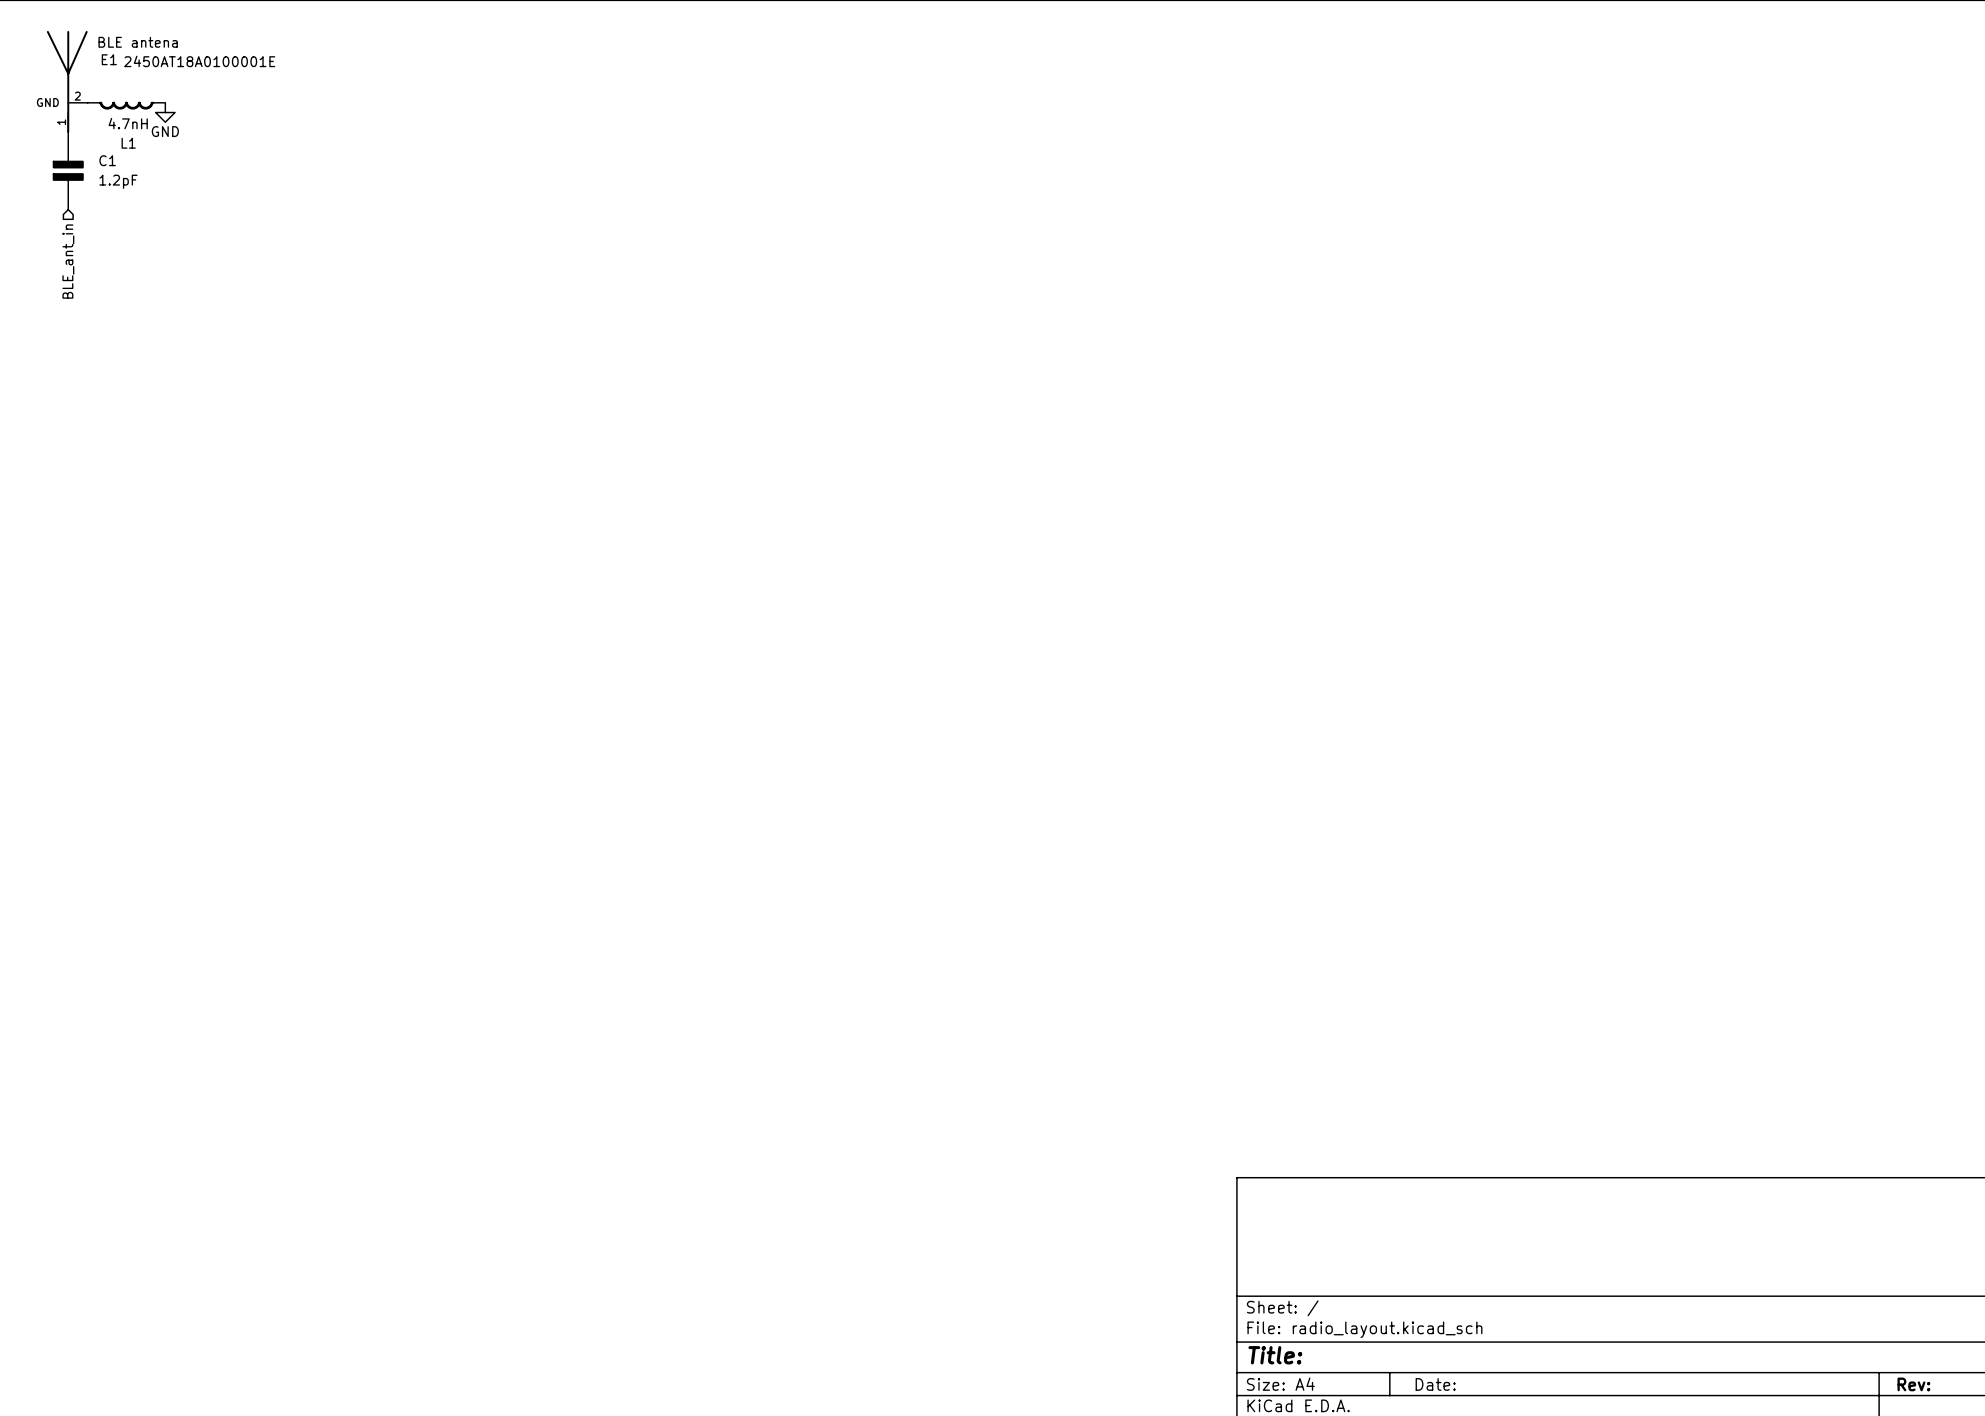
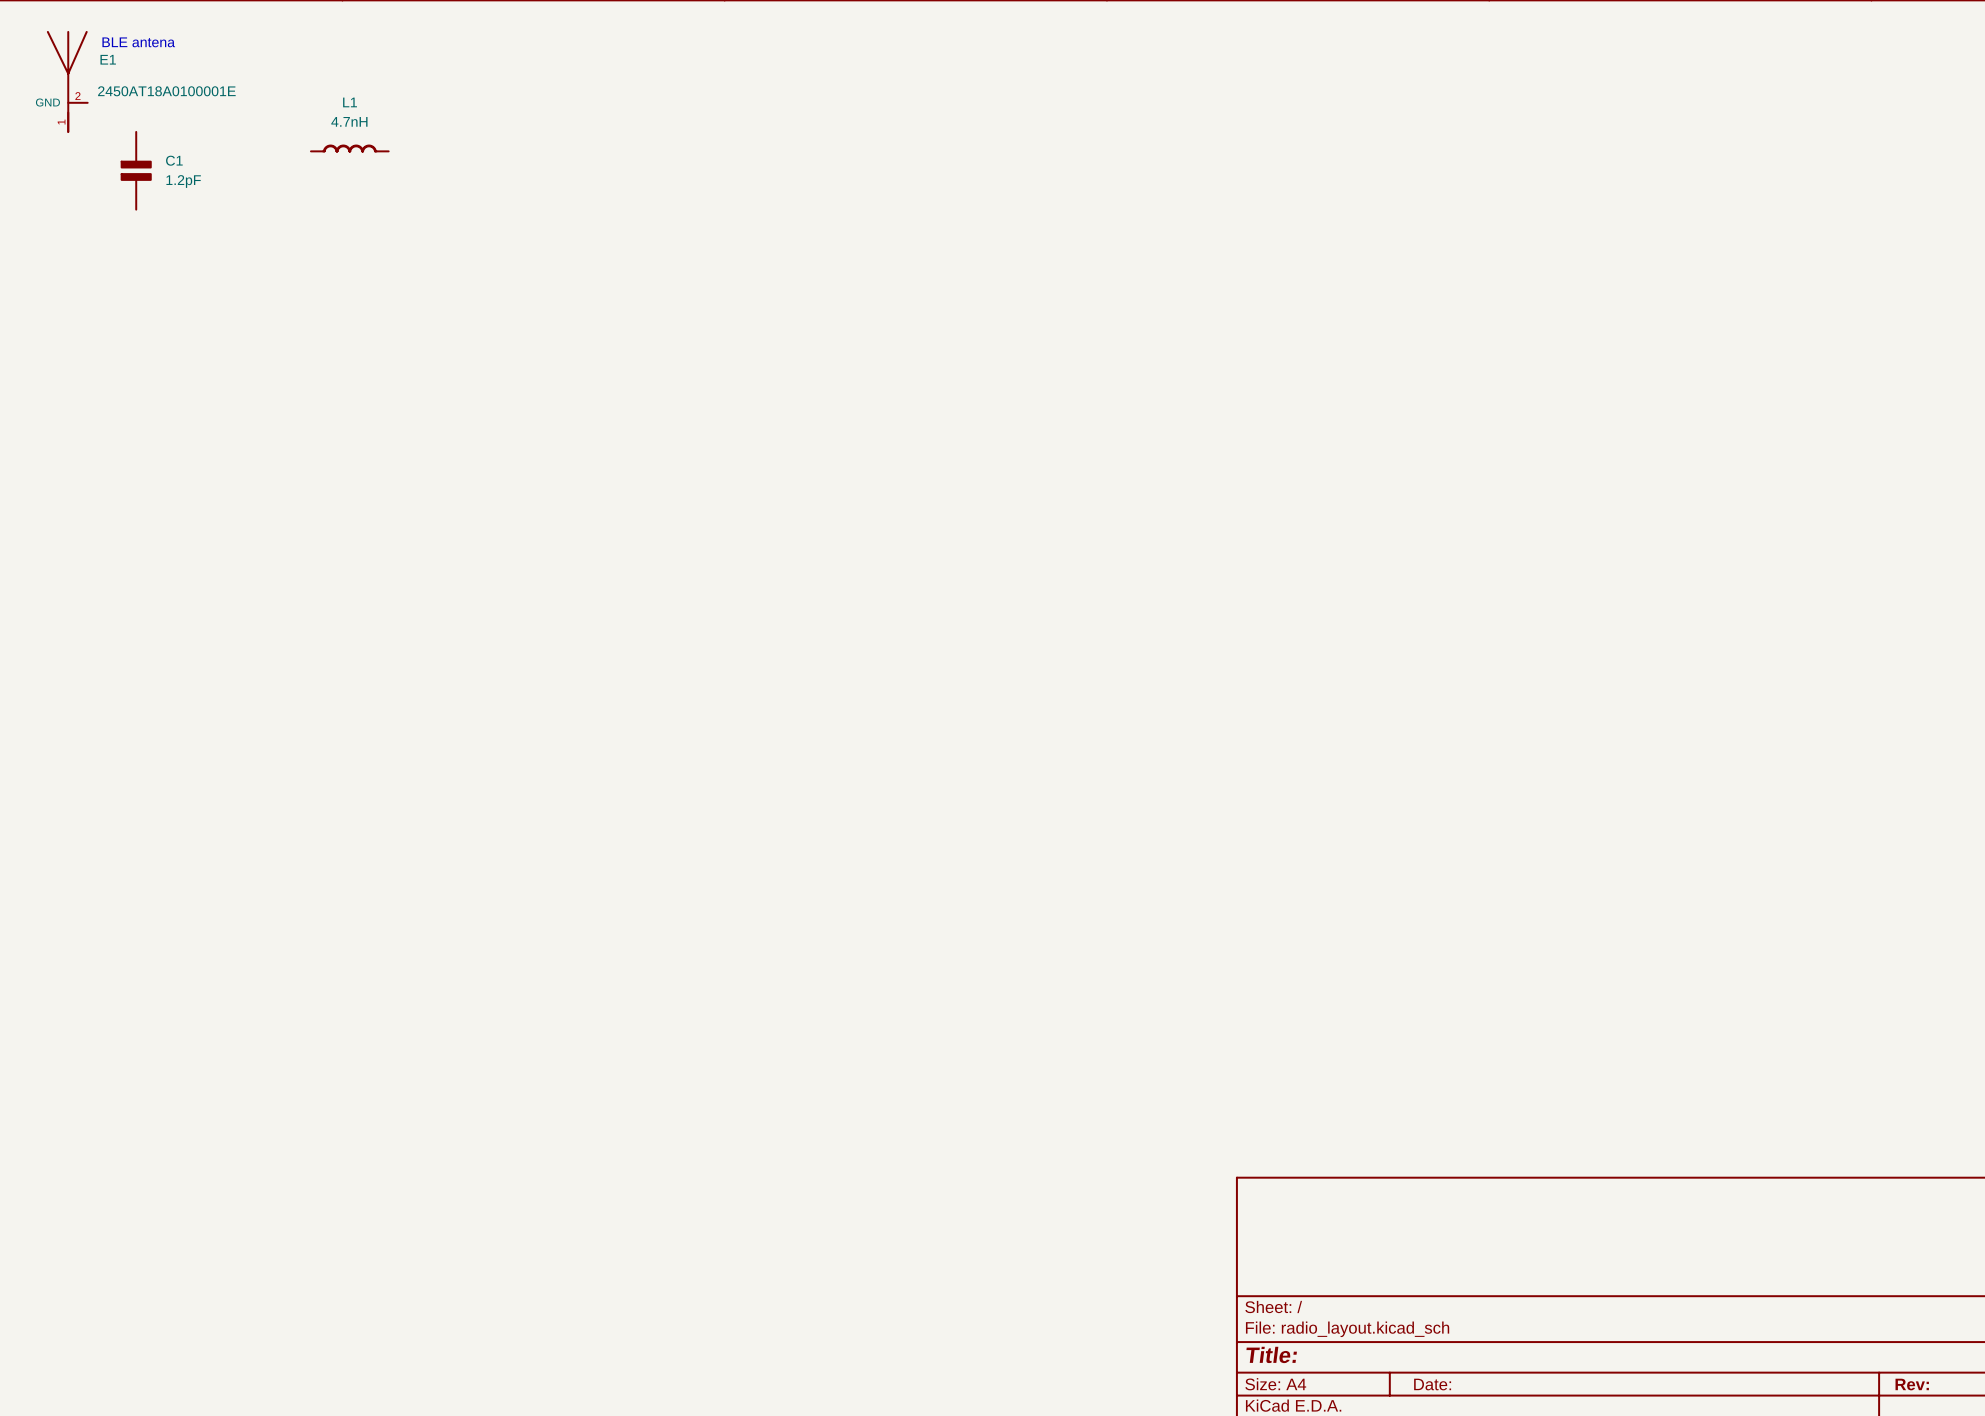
E1 value position: 2450AT18A0100001E (199, 61) -> 2450AT18A0100001E (166, 91)
L1 rotation: 0° (126, 105) -> 180° (349, 148)
L1 position: (126, 105) -> (349, 148)
power symbol: GND (165, 112) -> none
C1 position: (68, 170) -> (136, 170)
hierarchical label: BLE_ant_in (68, 261) -> none

